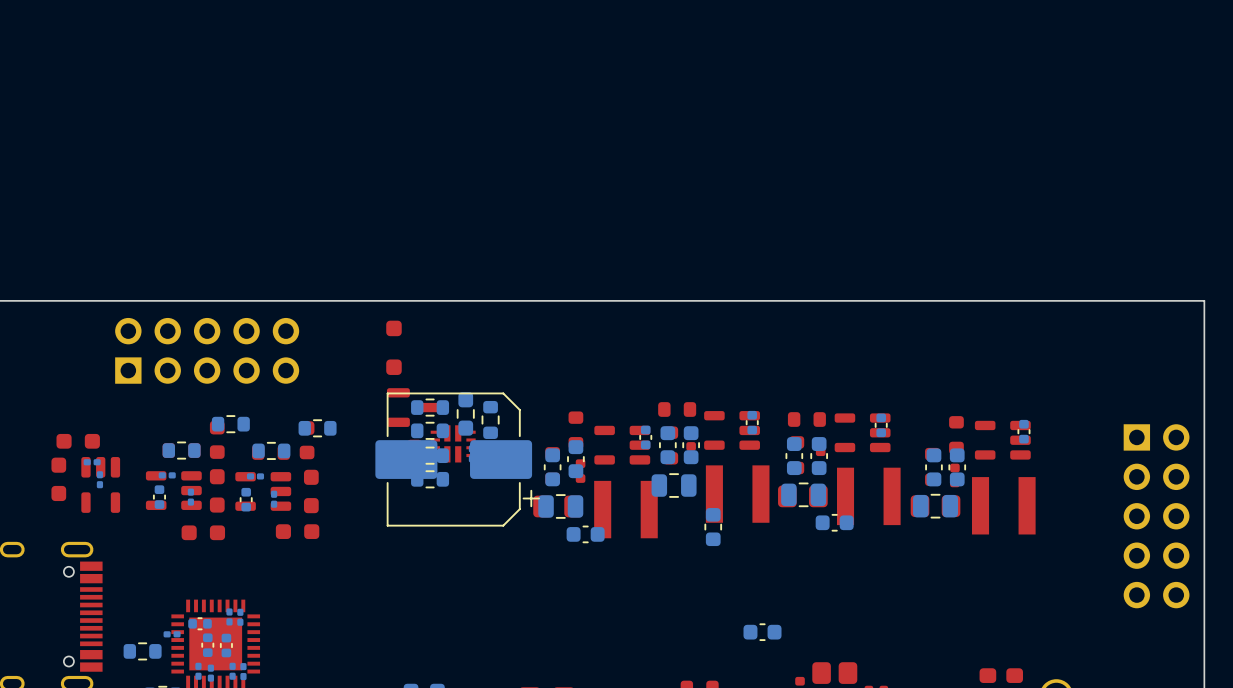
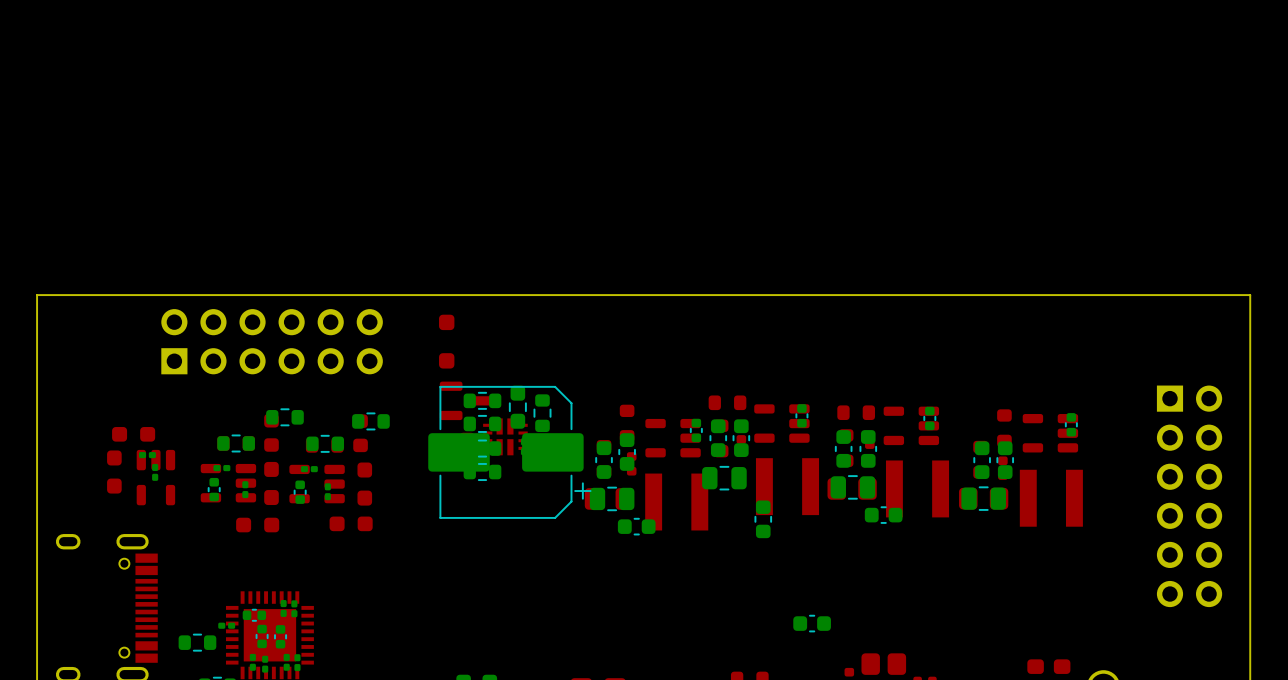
part footprint: [115, 317, 300, 384] -> [161, 309, 383, 375]
part: none -> (1189, 496)
part: (1156, 516) -> none

